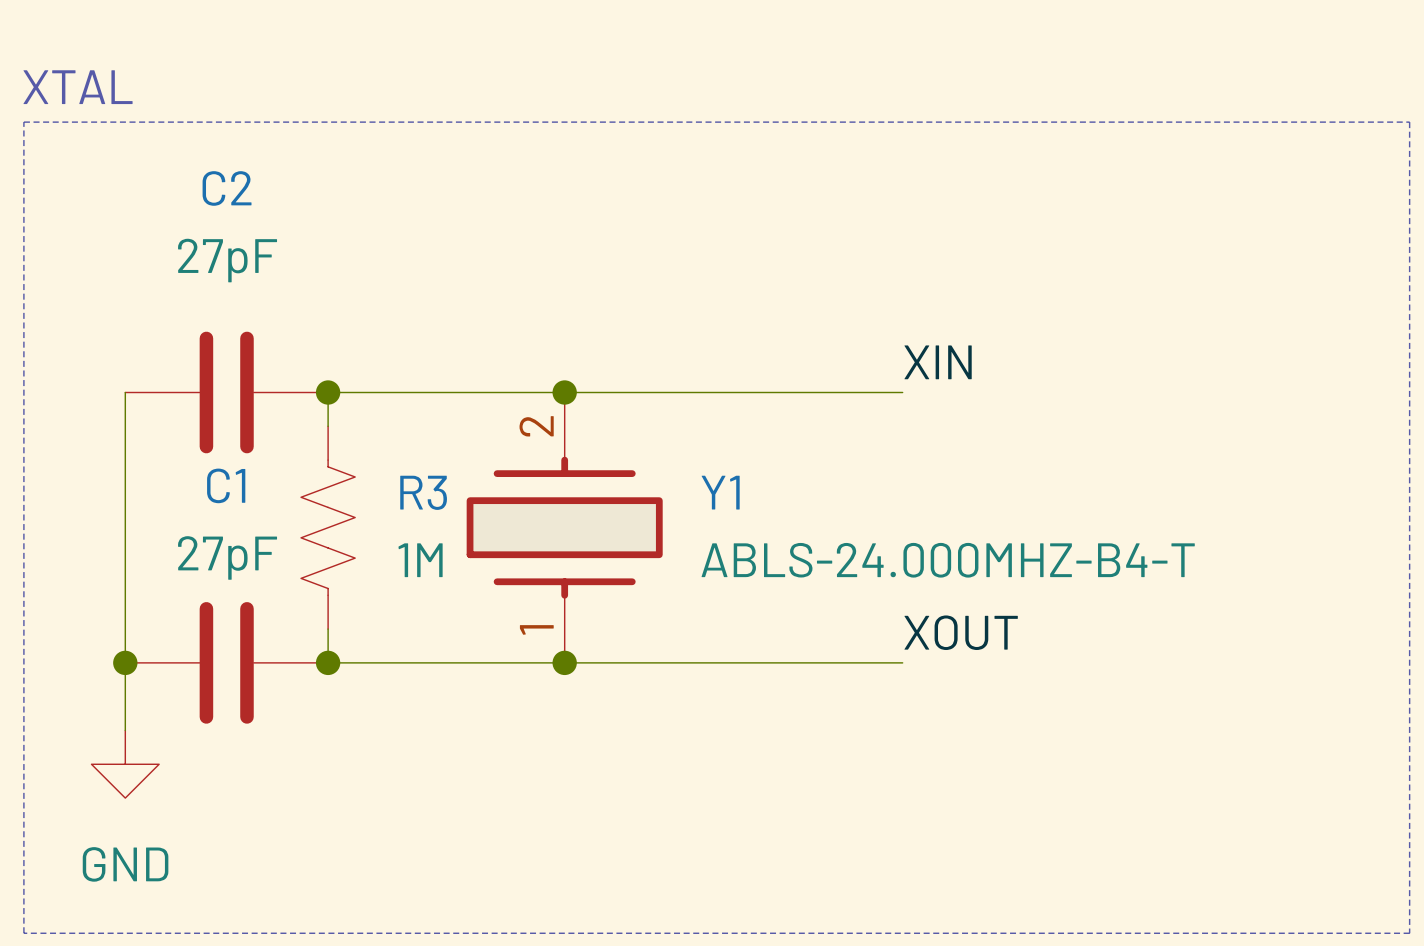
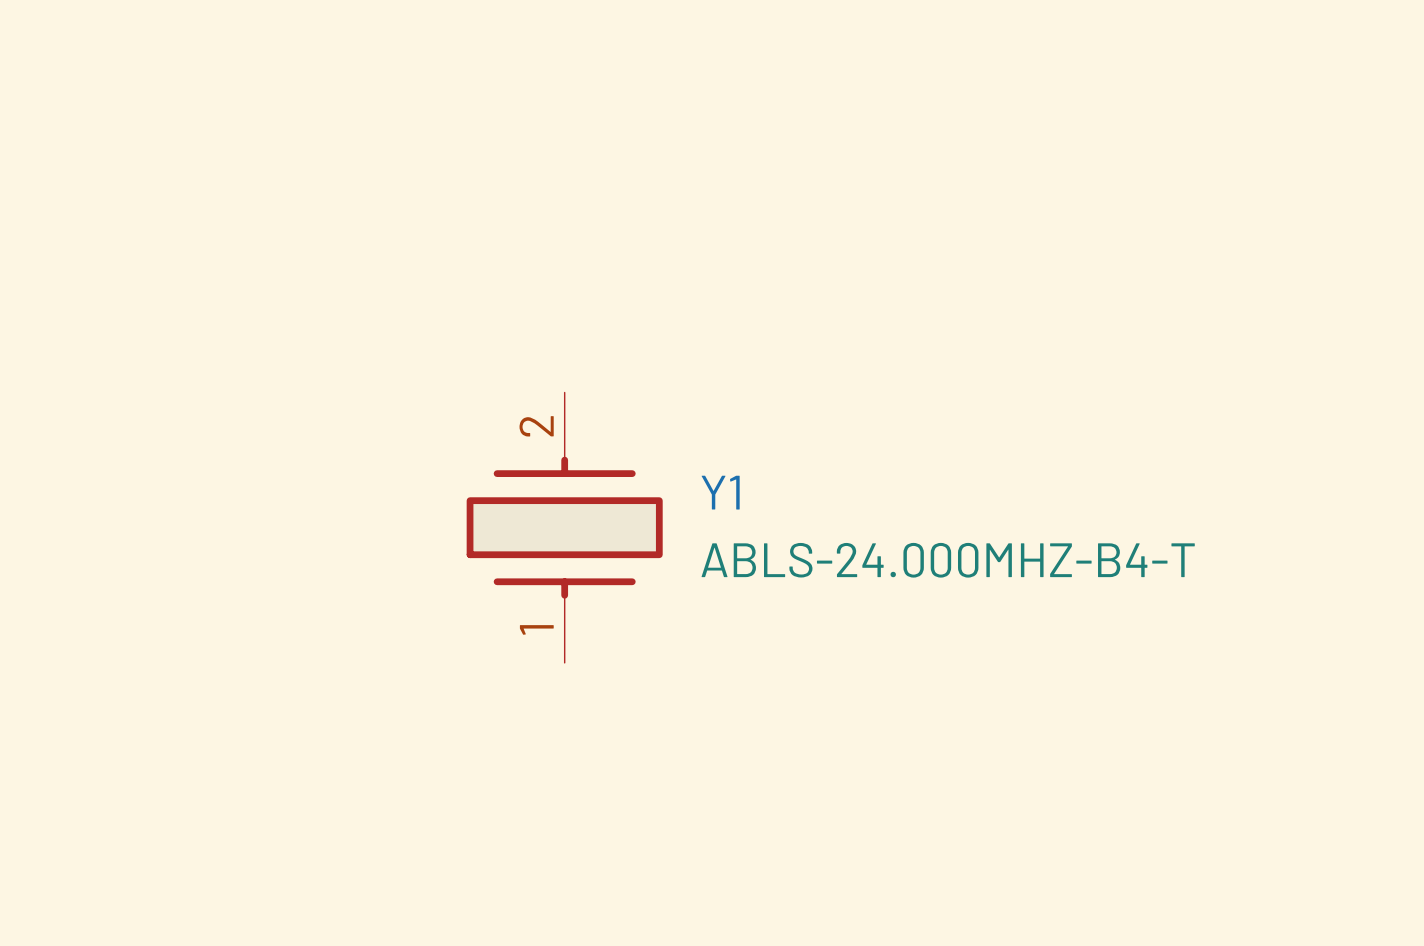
text: XTAL (78, 87) -> none
line: (23, 122) (1409, 122) (1409, 933) (23, 933) (23, 122) -> none
label: XIN (938, 362) -> none
wire: (125, 392) (125, 730) -> none
C2: 27pF (226, 392) -> none
junction: (328, 392) -> none
junction: (564, 392) -> none
wire: (902, 392) (328, 392) (328, 426) -> none
R3: 1M (328, 527) -> none
wire: (328, 629) (328, 662) (902, 662) -> none
label: XOUT (961, 632) -> none
junction: (125, 662) -> none
C1: 27pF (226, 662) -> none
junction: (328, 662) -> none
junction: (564, 662) -> none
power symbol: GND (125, 764) -> none

